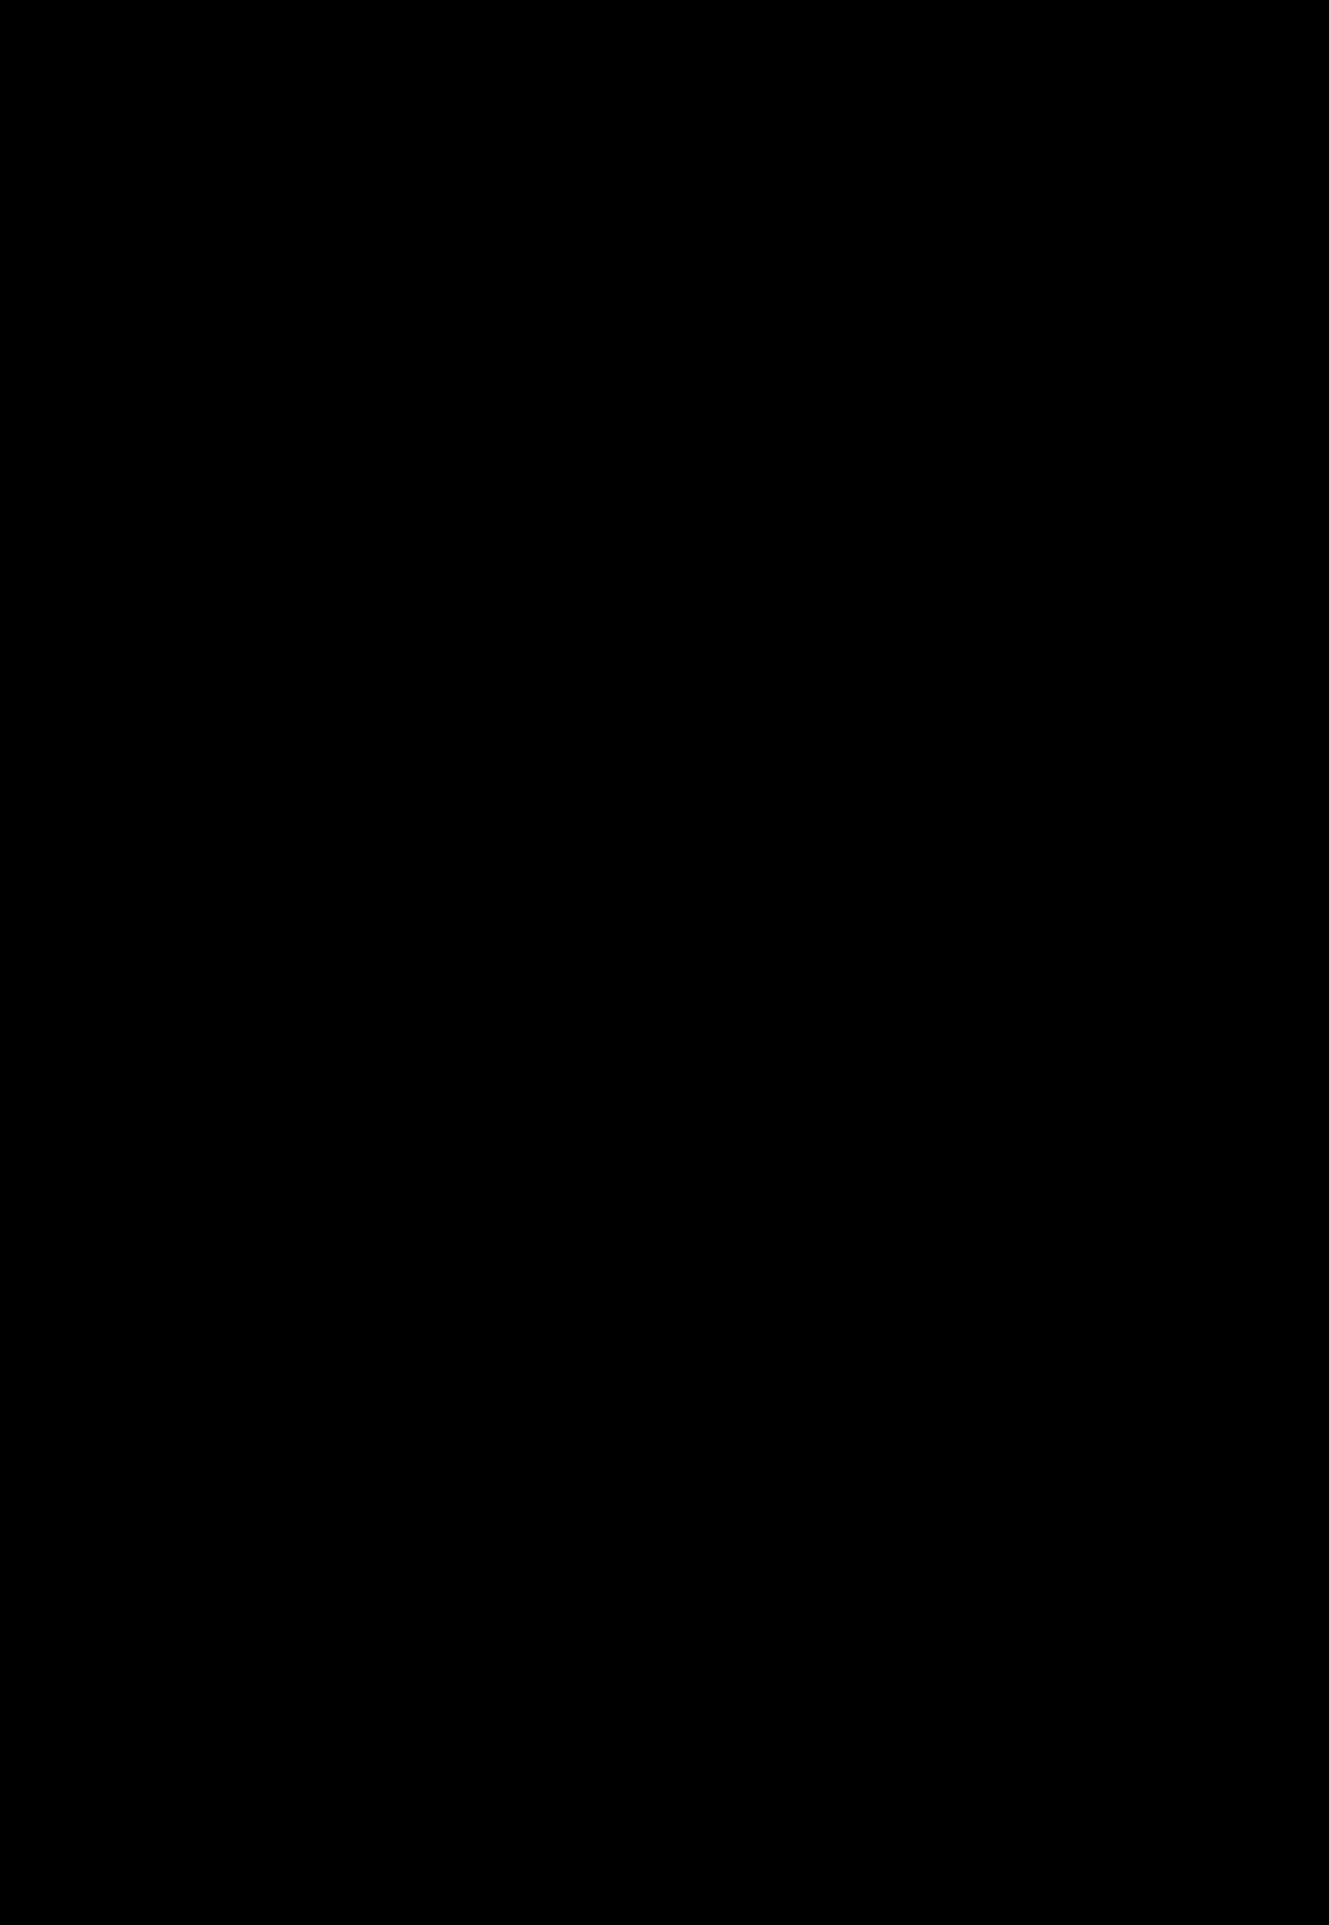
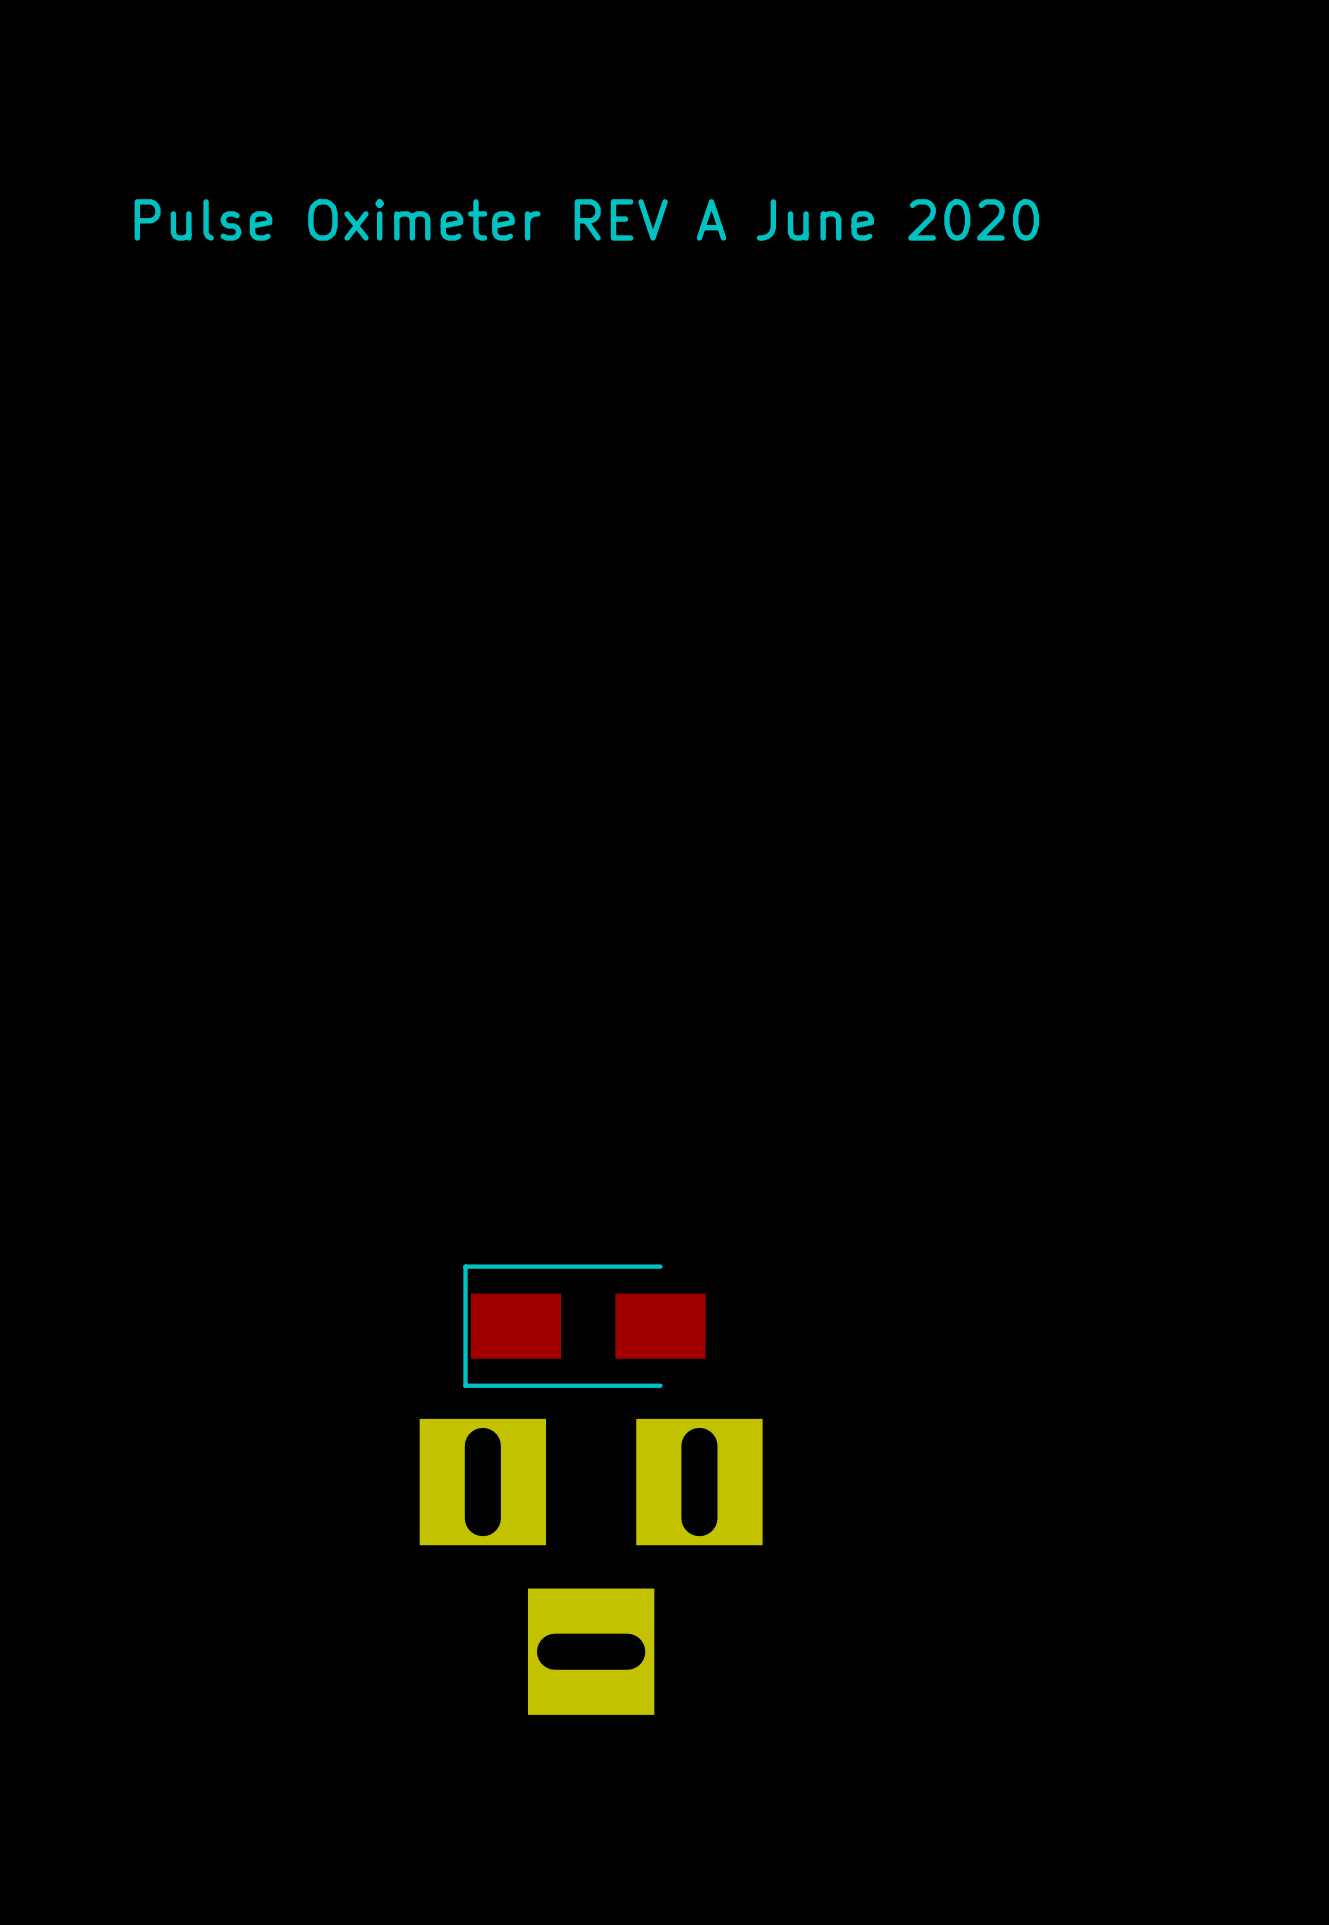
text: none -> Pulse Oximeter REV A June 2020 (586, 219)
part: none -> (584, 1326)
part: none -> (591, 1566)

